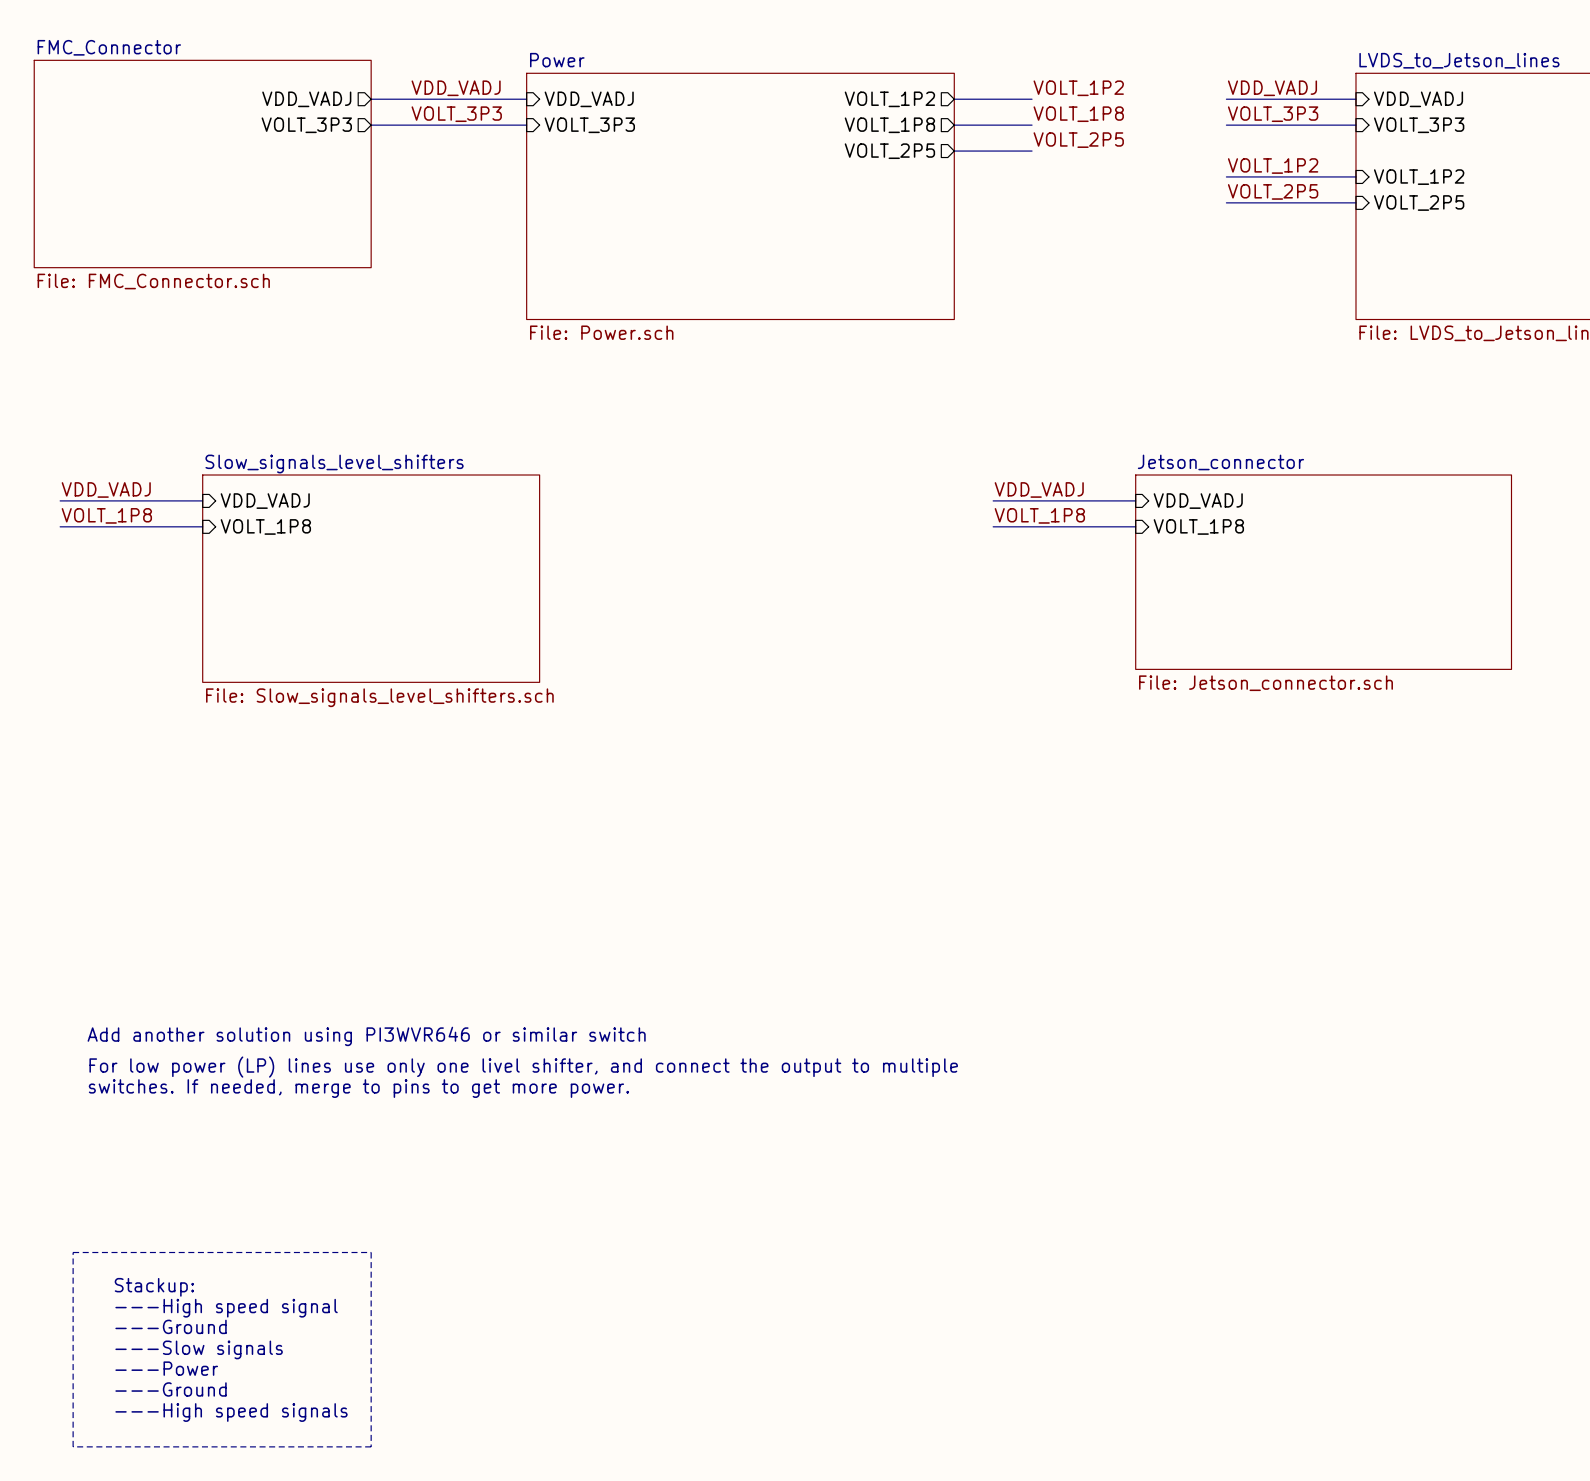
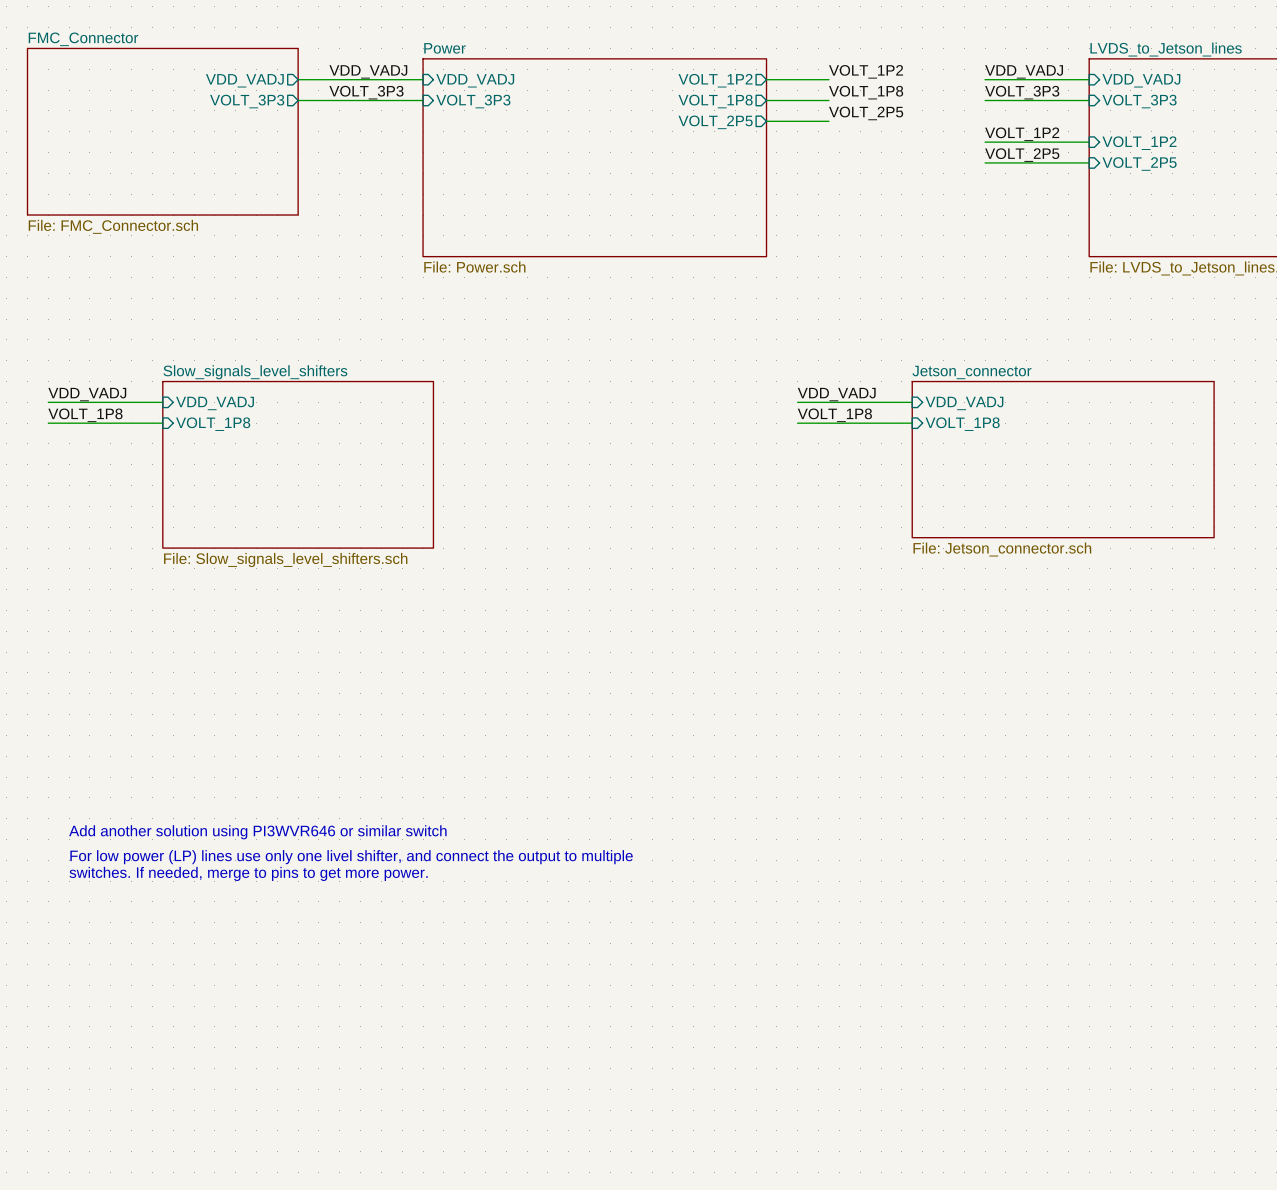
line: (73, 1252) (371, 1252) (371, 1446) (73, 1446) (73, 1252) -> none
text: Stackup: (154, 1287) -> none
text: ---High speed signal (226, 1308) -> none
text: ---Ground (171, 1326) -> none
text: ---Slow signals (199, 1349) -> none
text: ---Power (166, 1368) -> none
text: ---Ground (171, 1389) -> none
text: ---High speed signals (231, 1412) -> none

